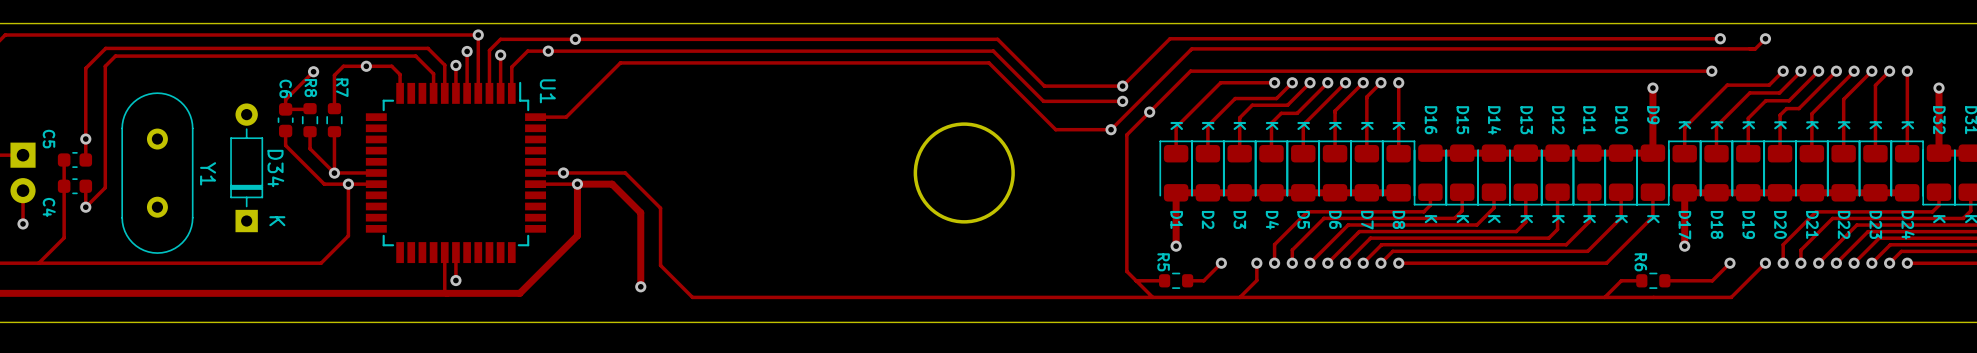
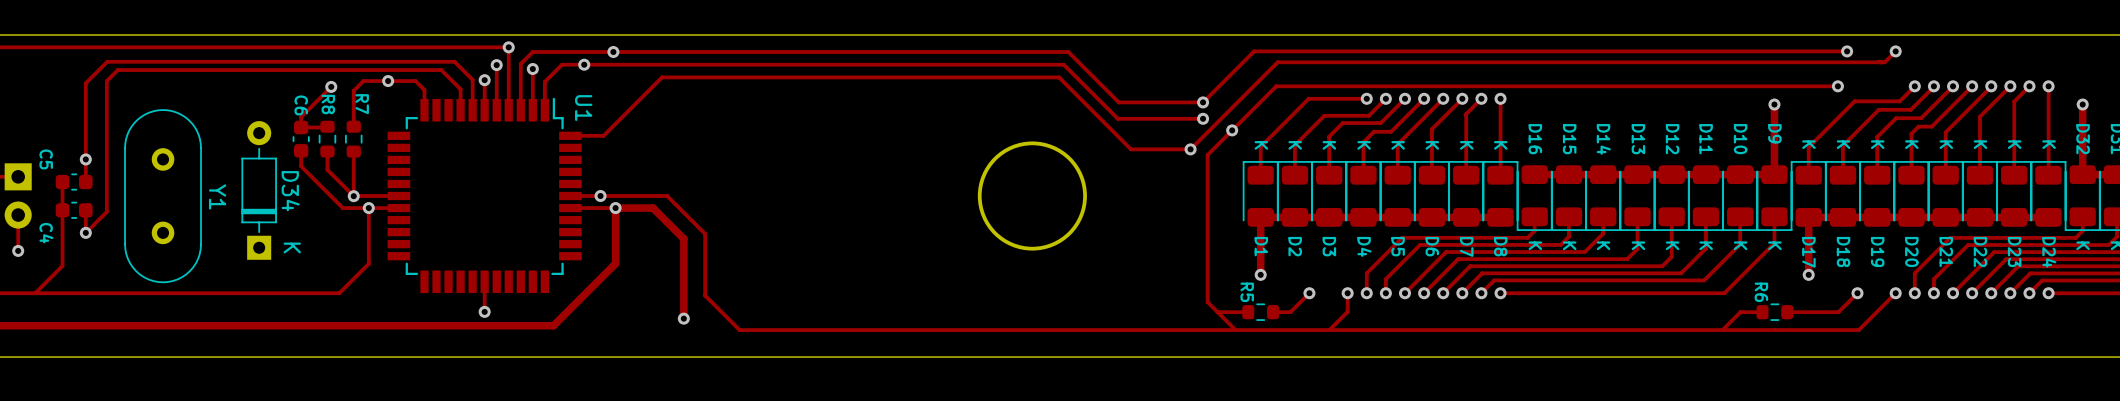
track: (444, 252) (444, 291) -> none

